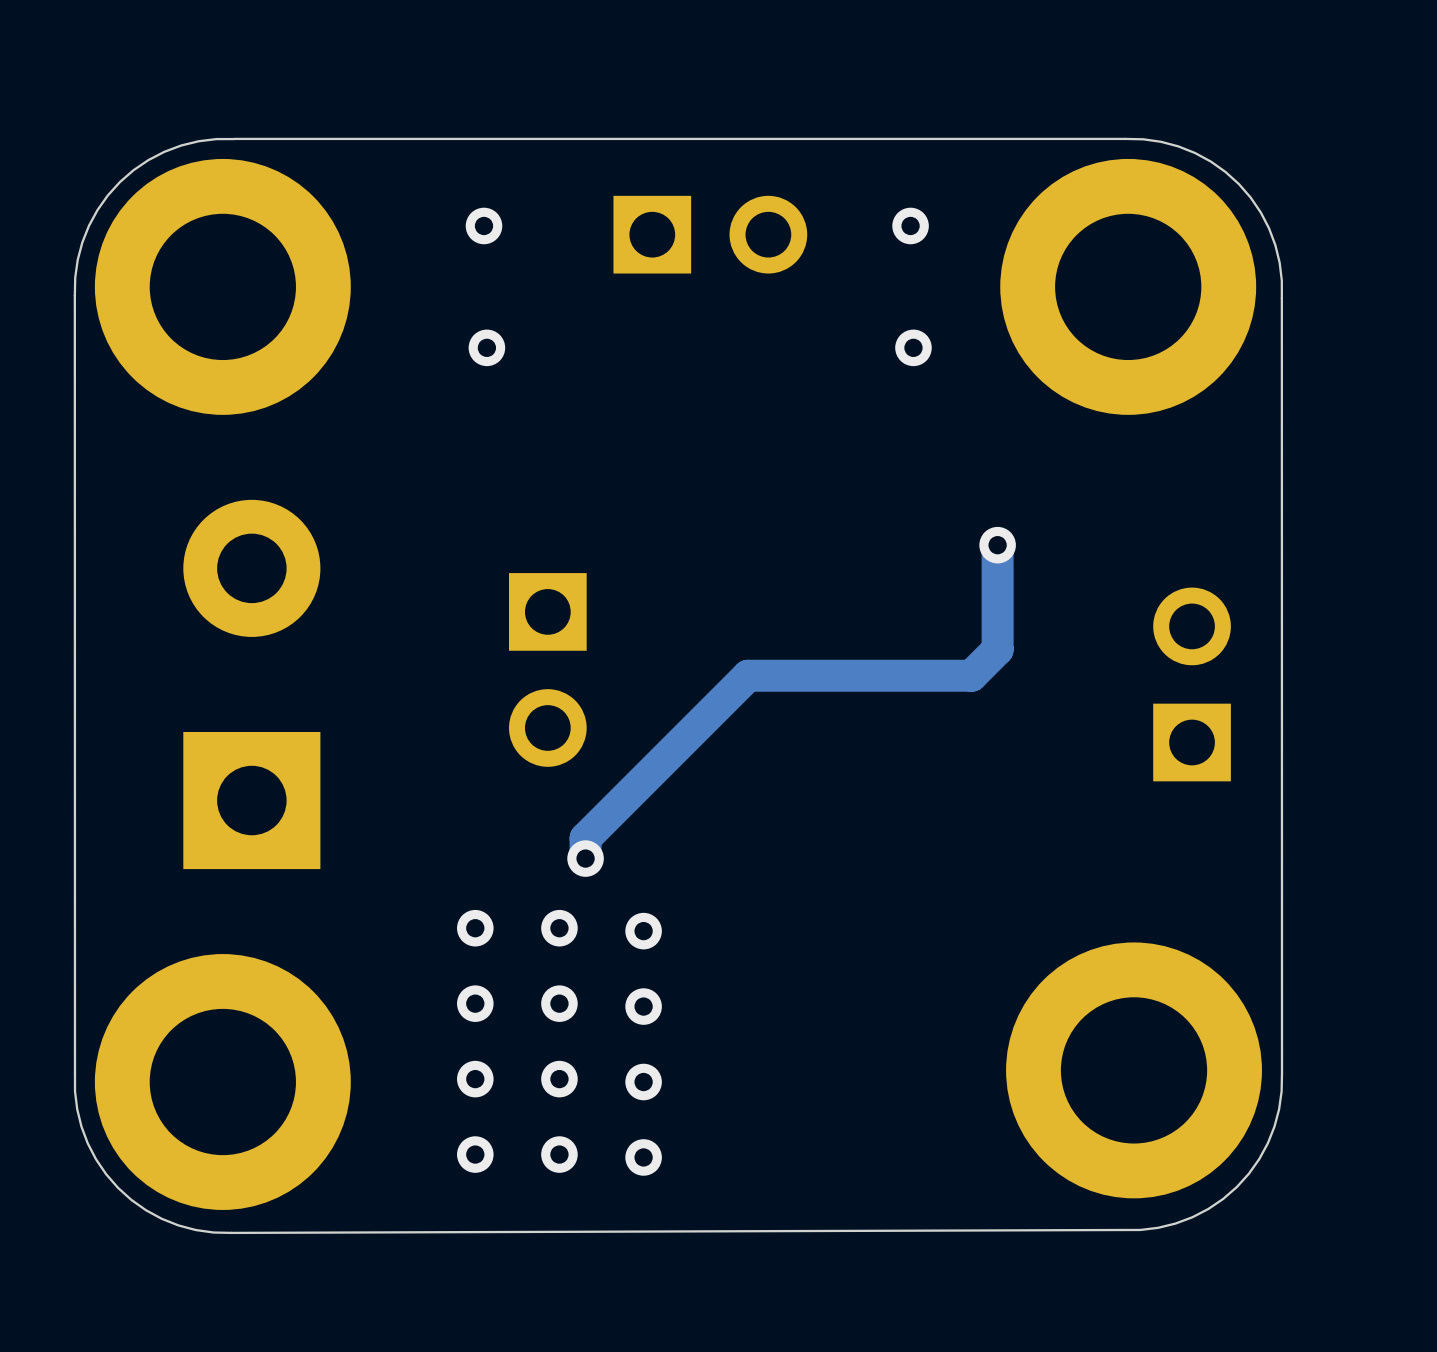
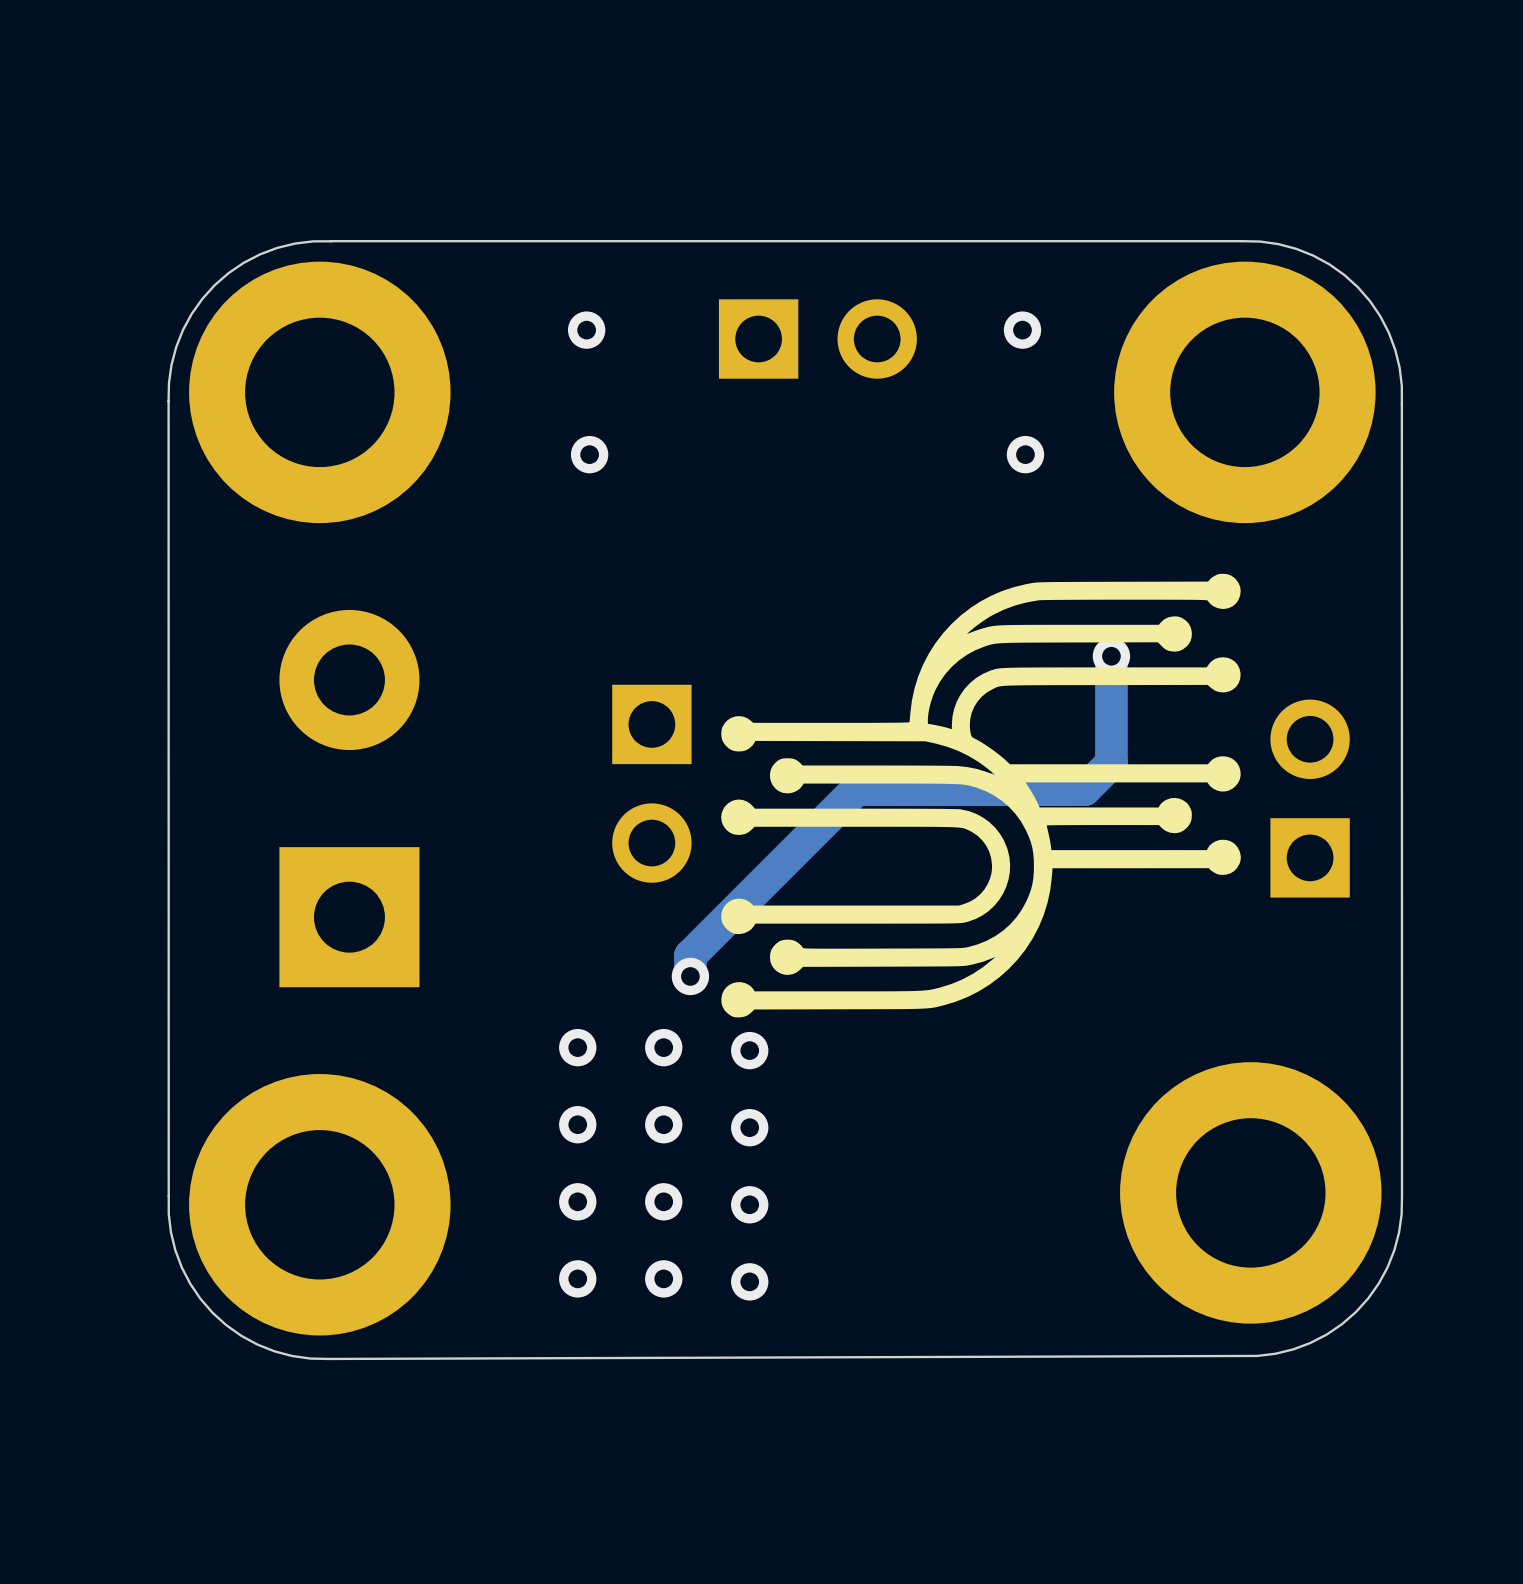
drawing: none -> [721, 573, 1241, 1018]

